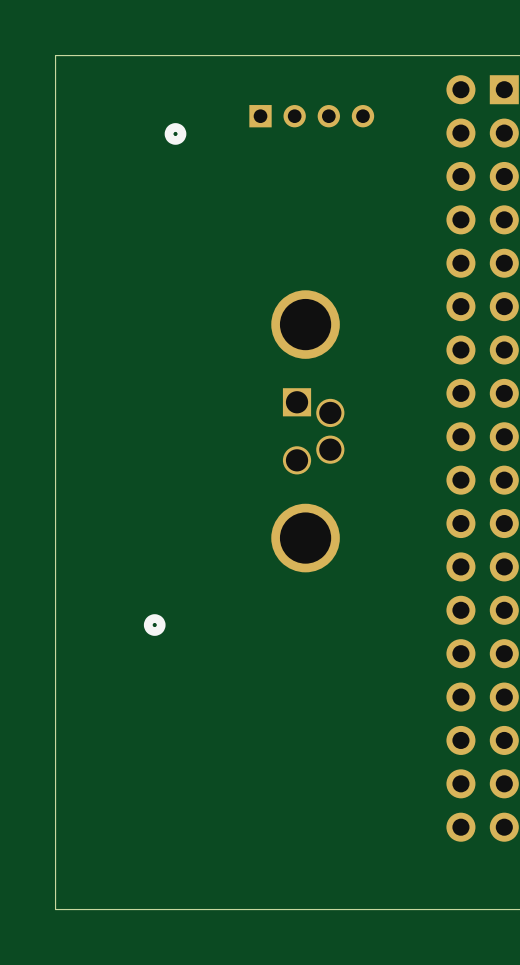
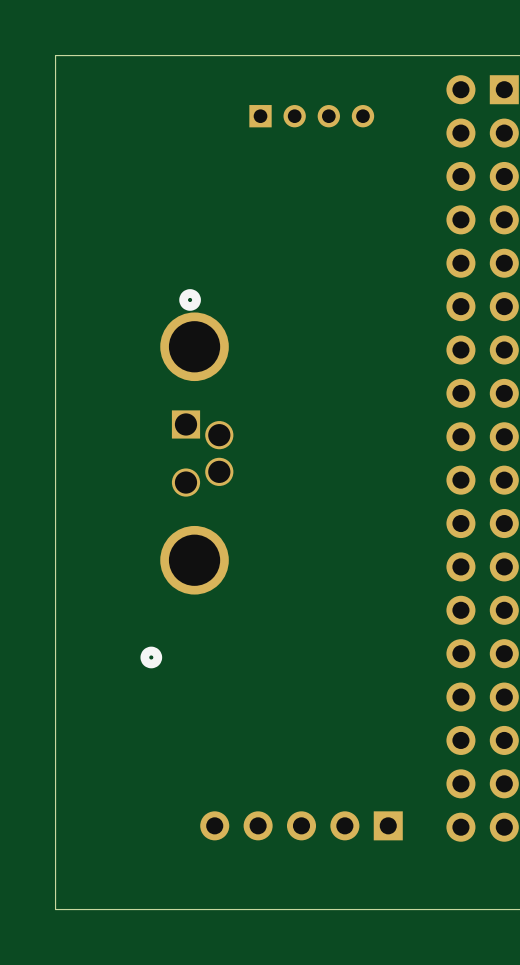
part: (175, 133) -> none
part: none -> (190, 299)
part position: (307, 431) -> (196, 453)
part position: (154, 625) -> (151, 657)
part: none -> (301, 825)

